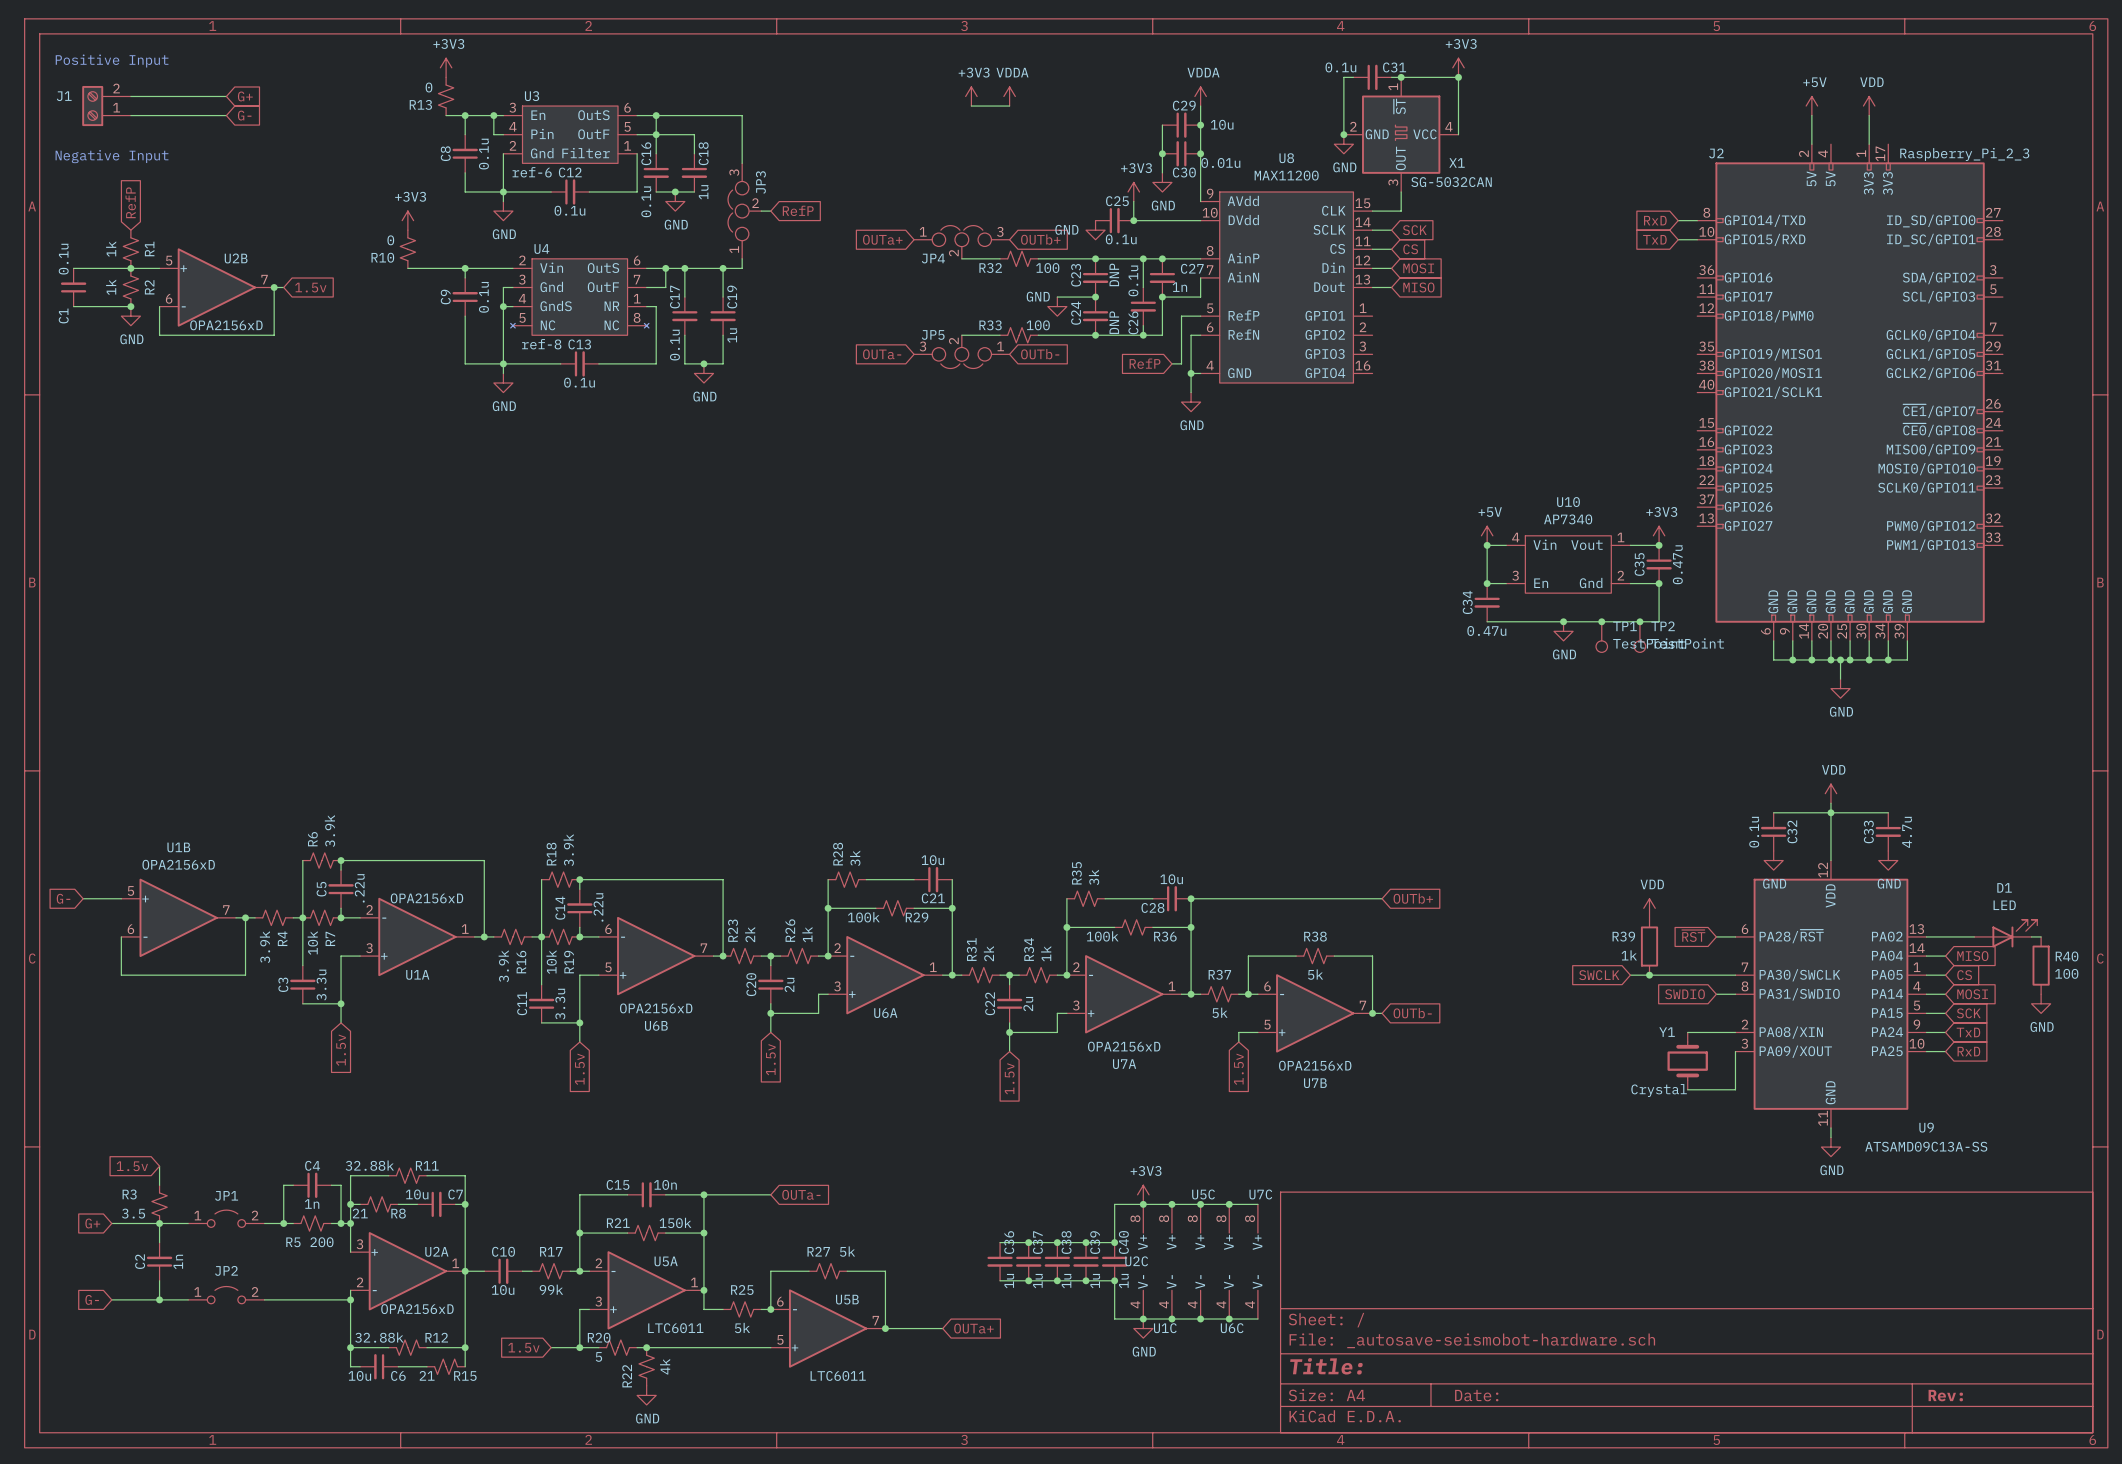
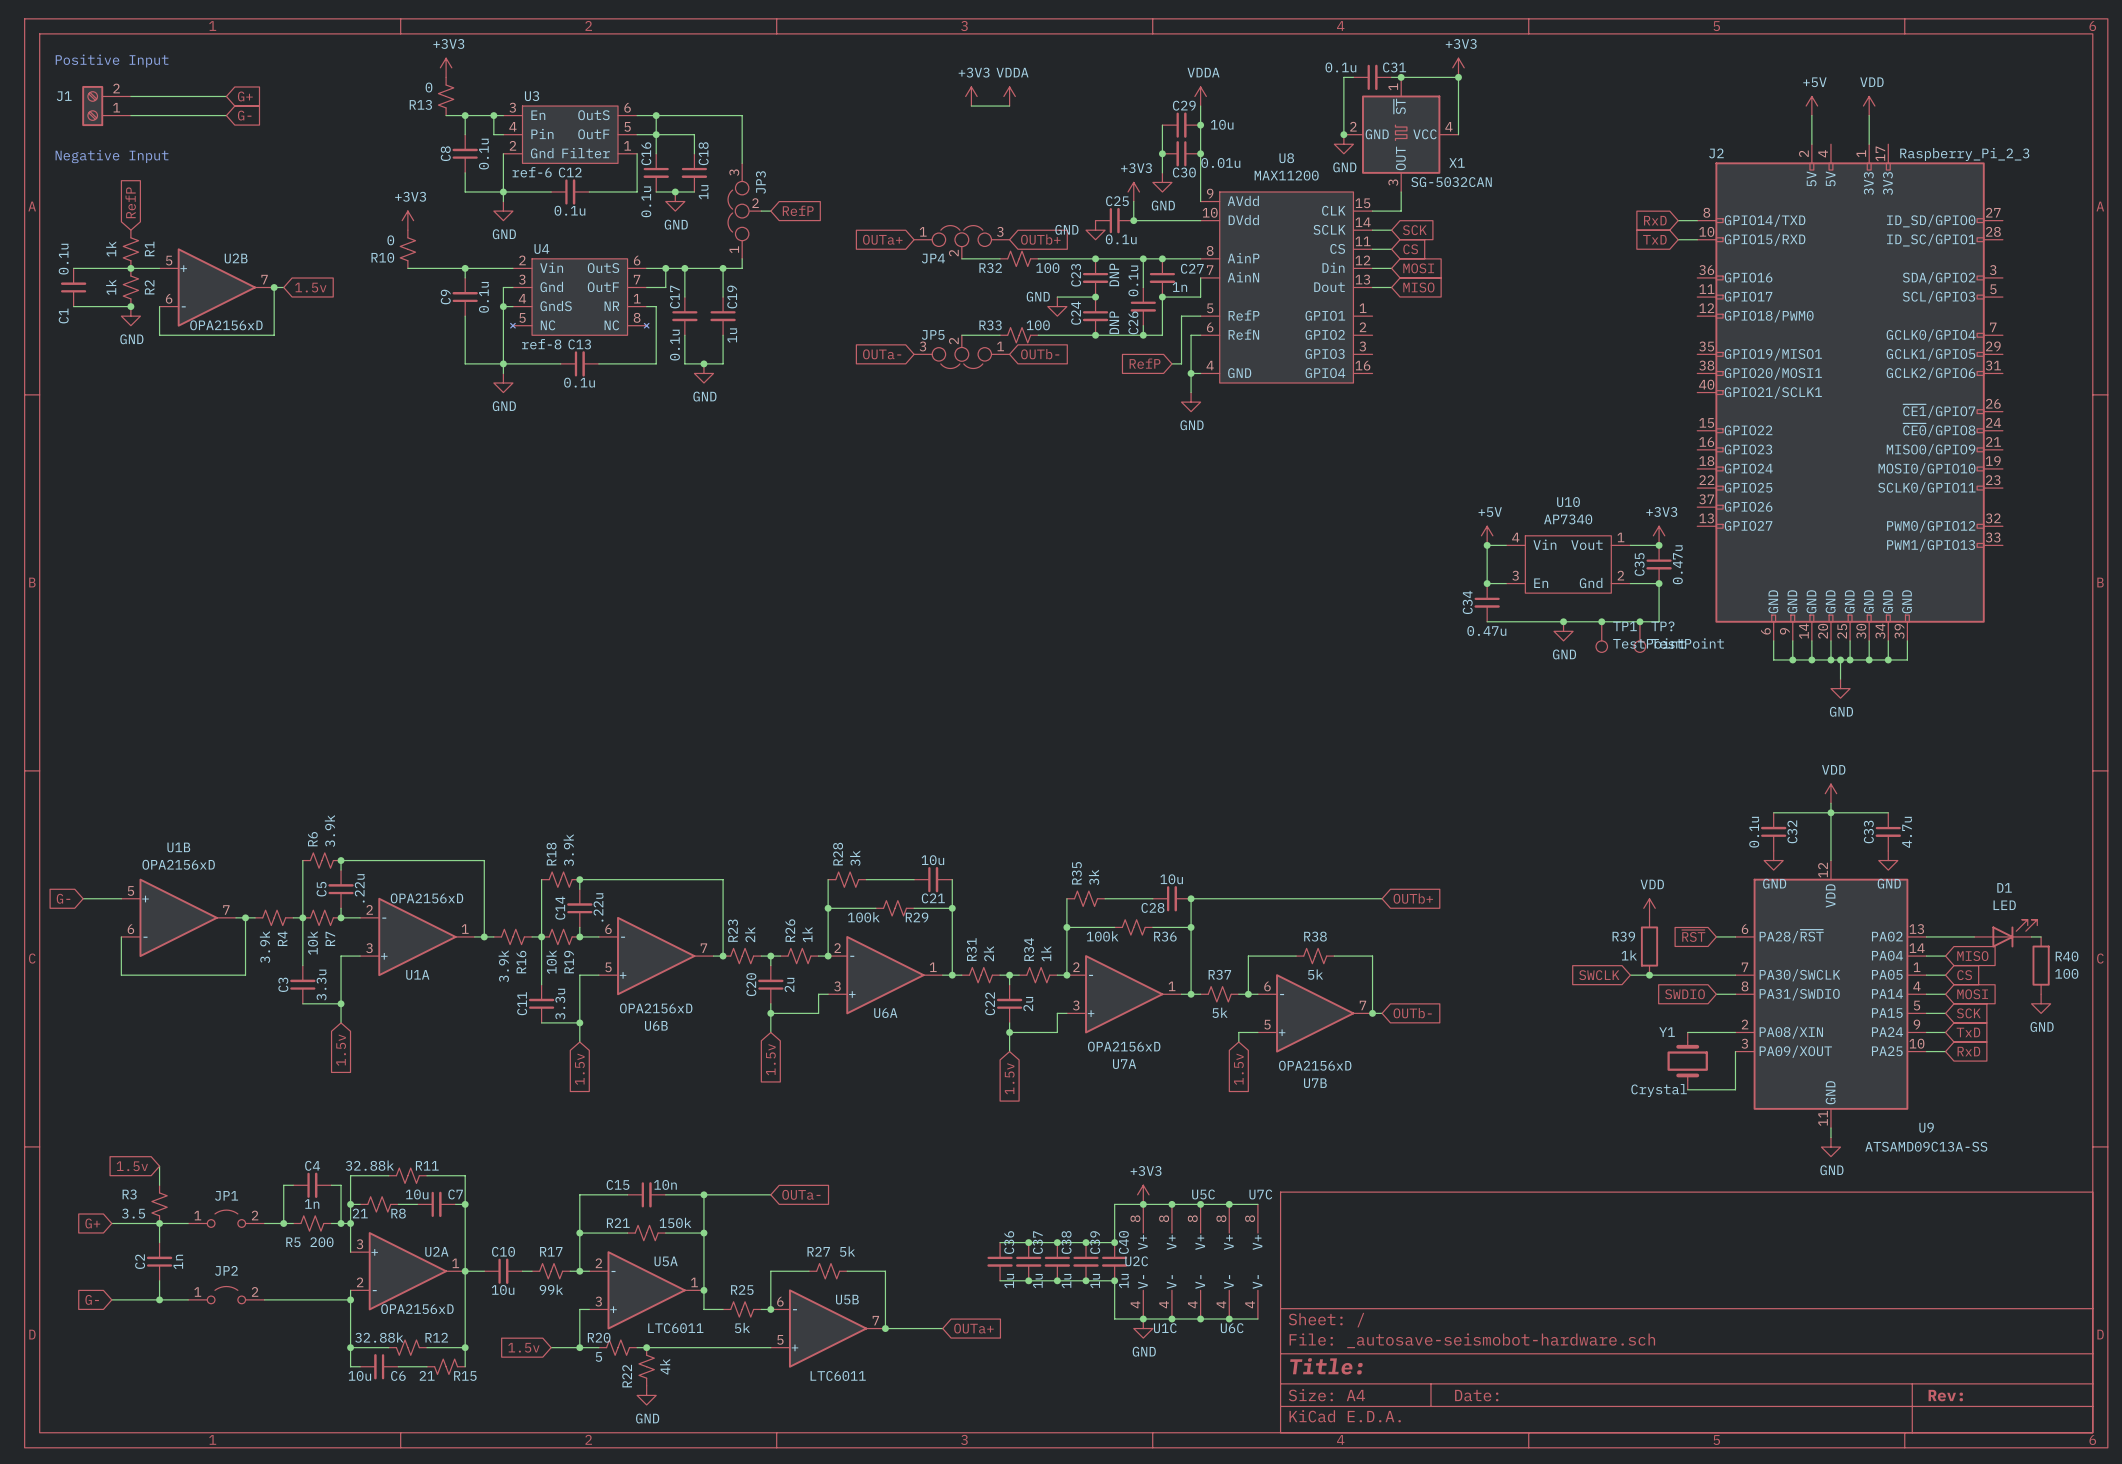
TP2 name: TP2 (1663, 626) -> TP? (1662, 626)

